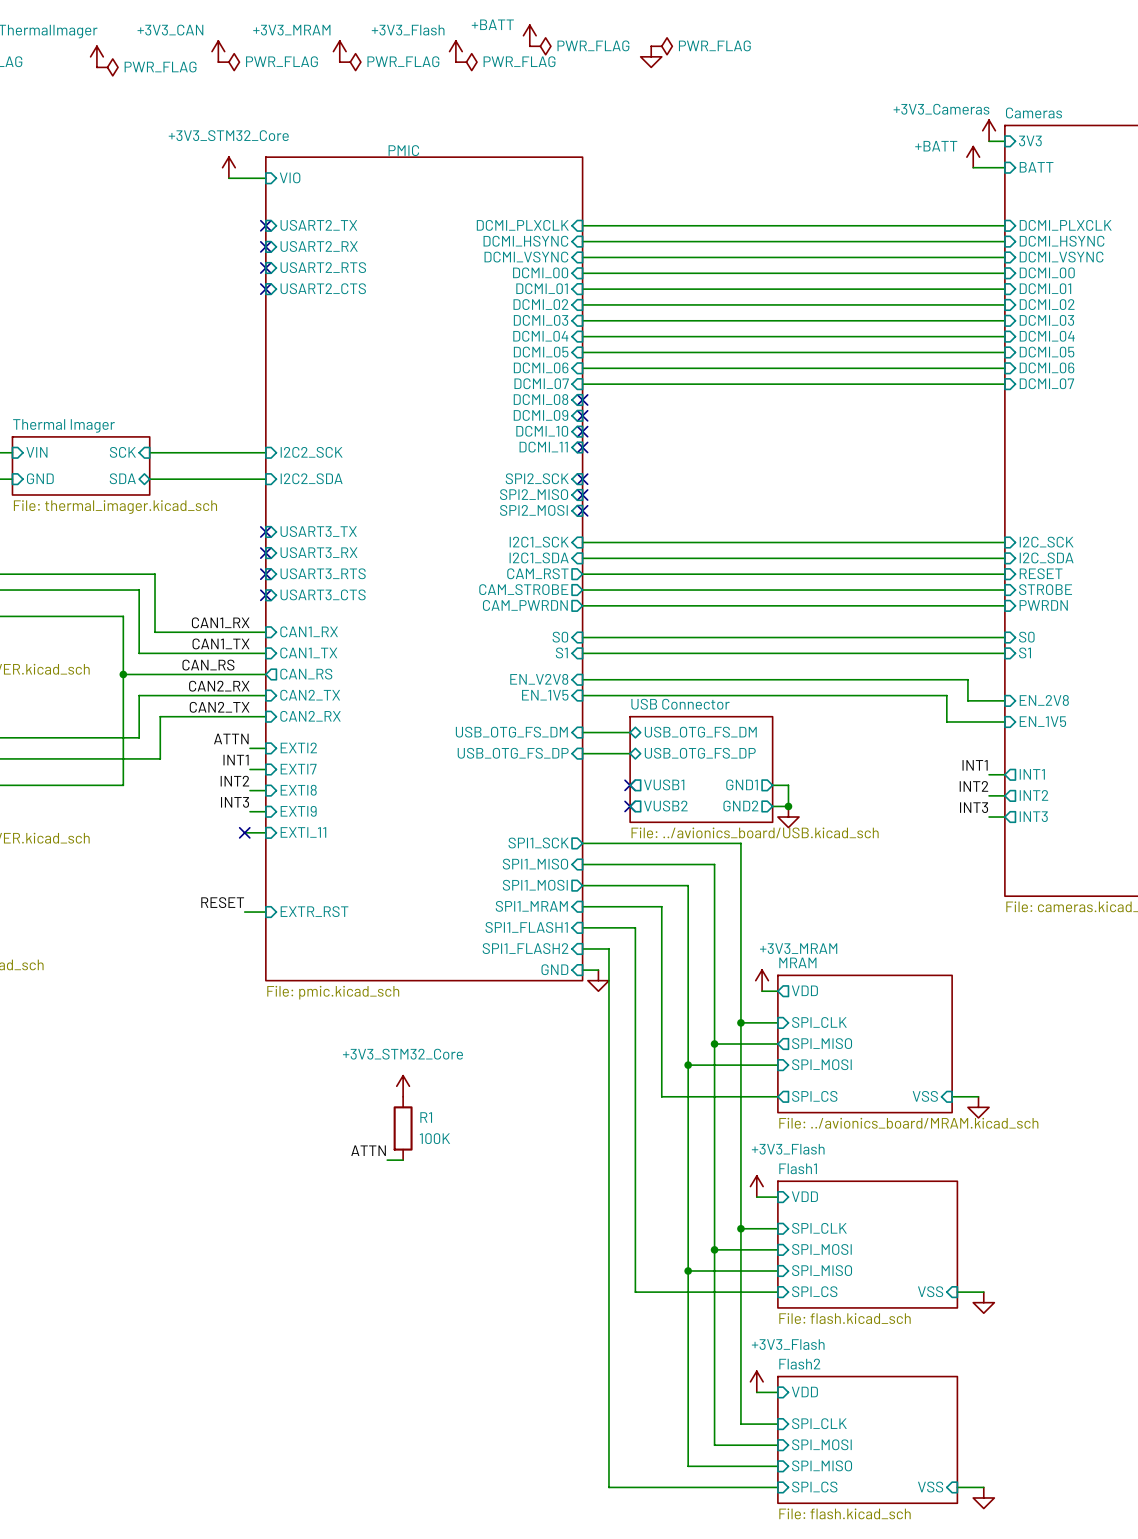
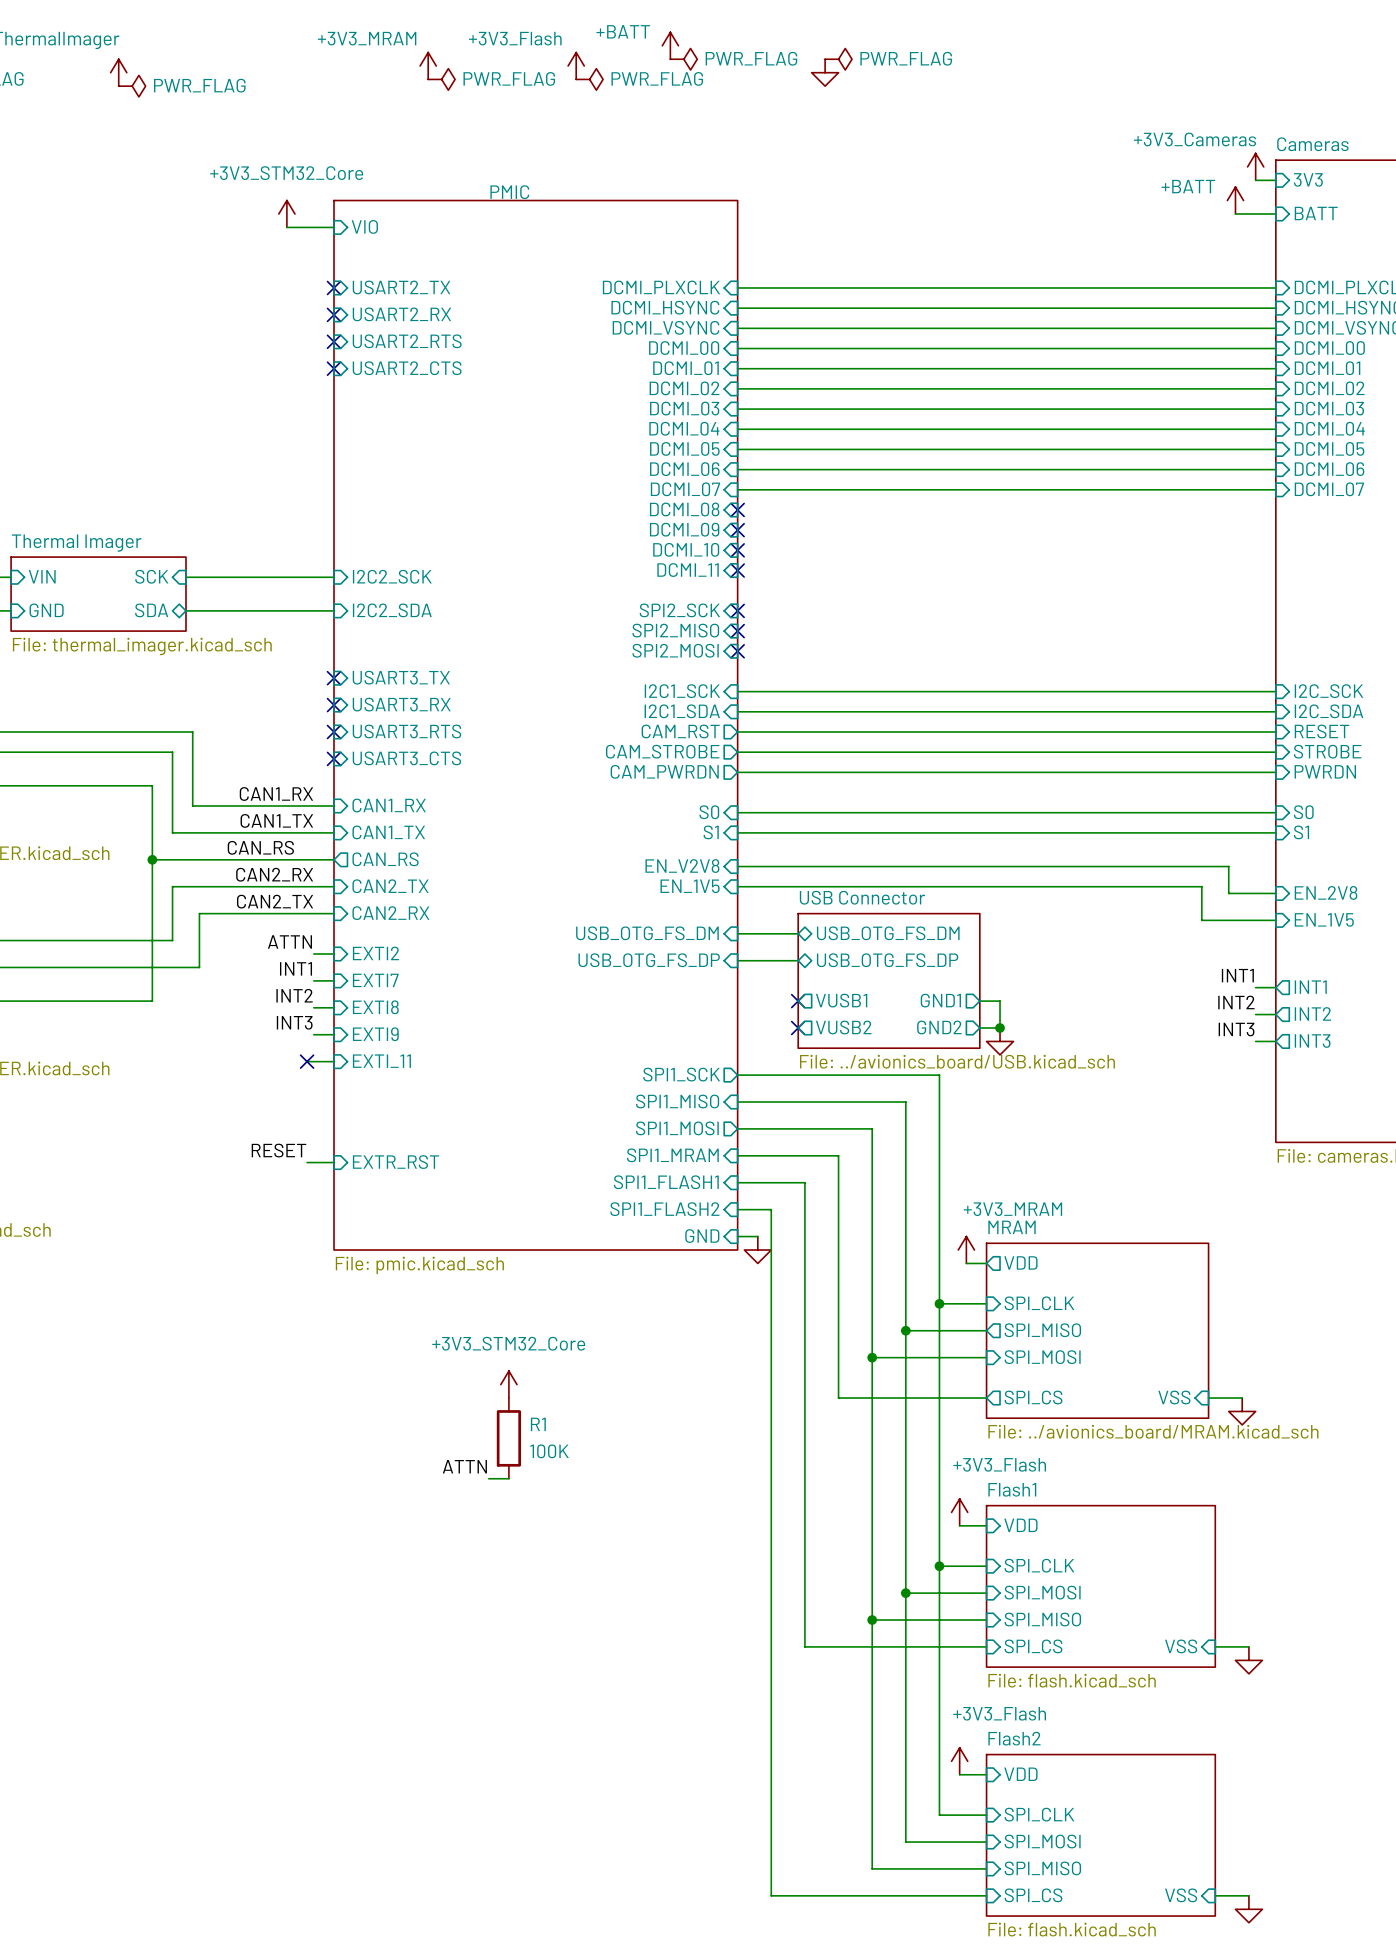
power symbol: +3V3_CAN (218, 51) -> none
power symbol: PWR_FLAG (228, 62) -> none

